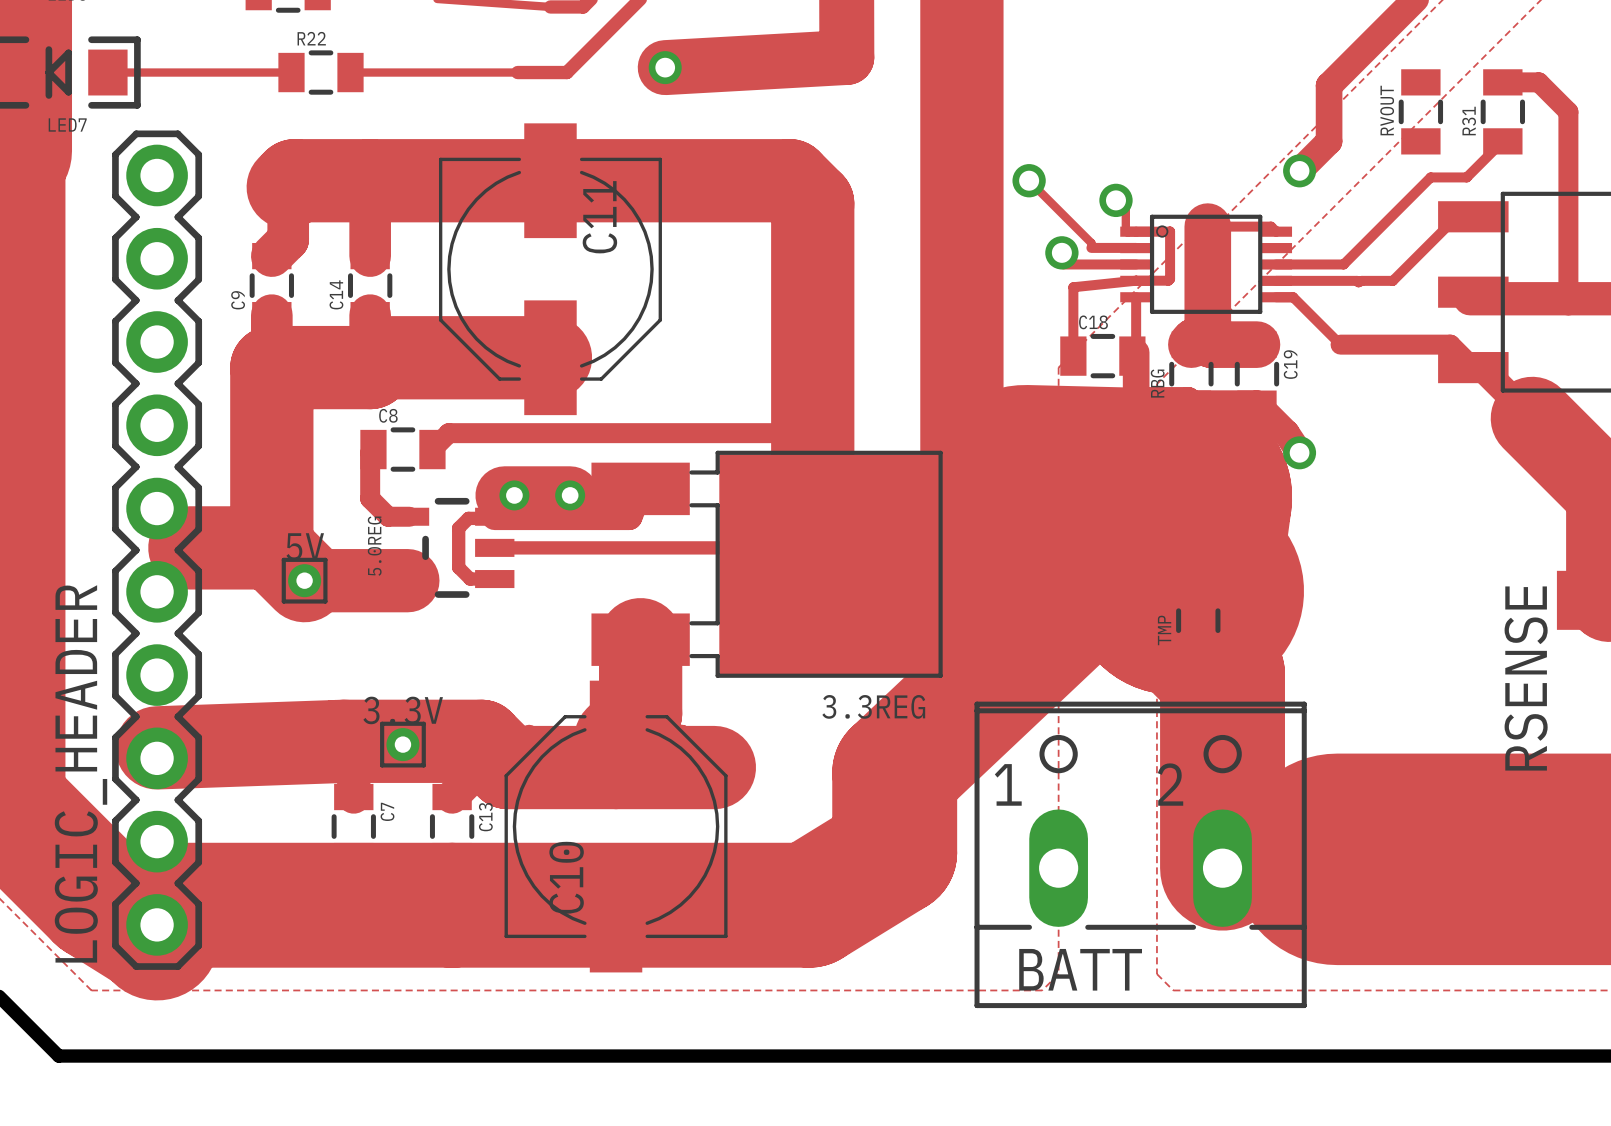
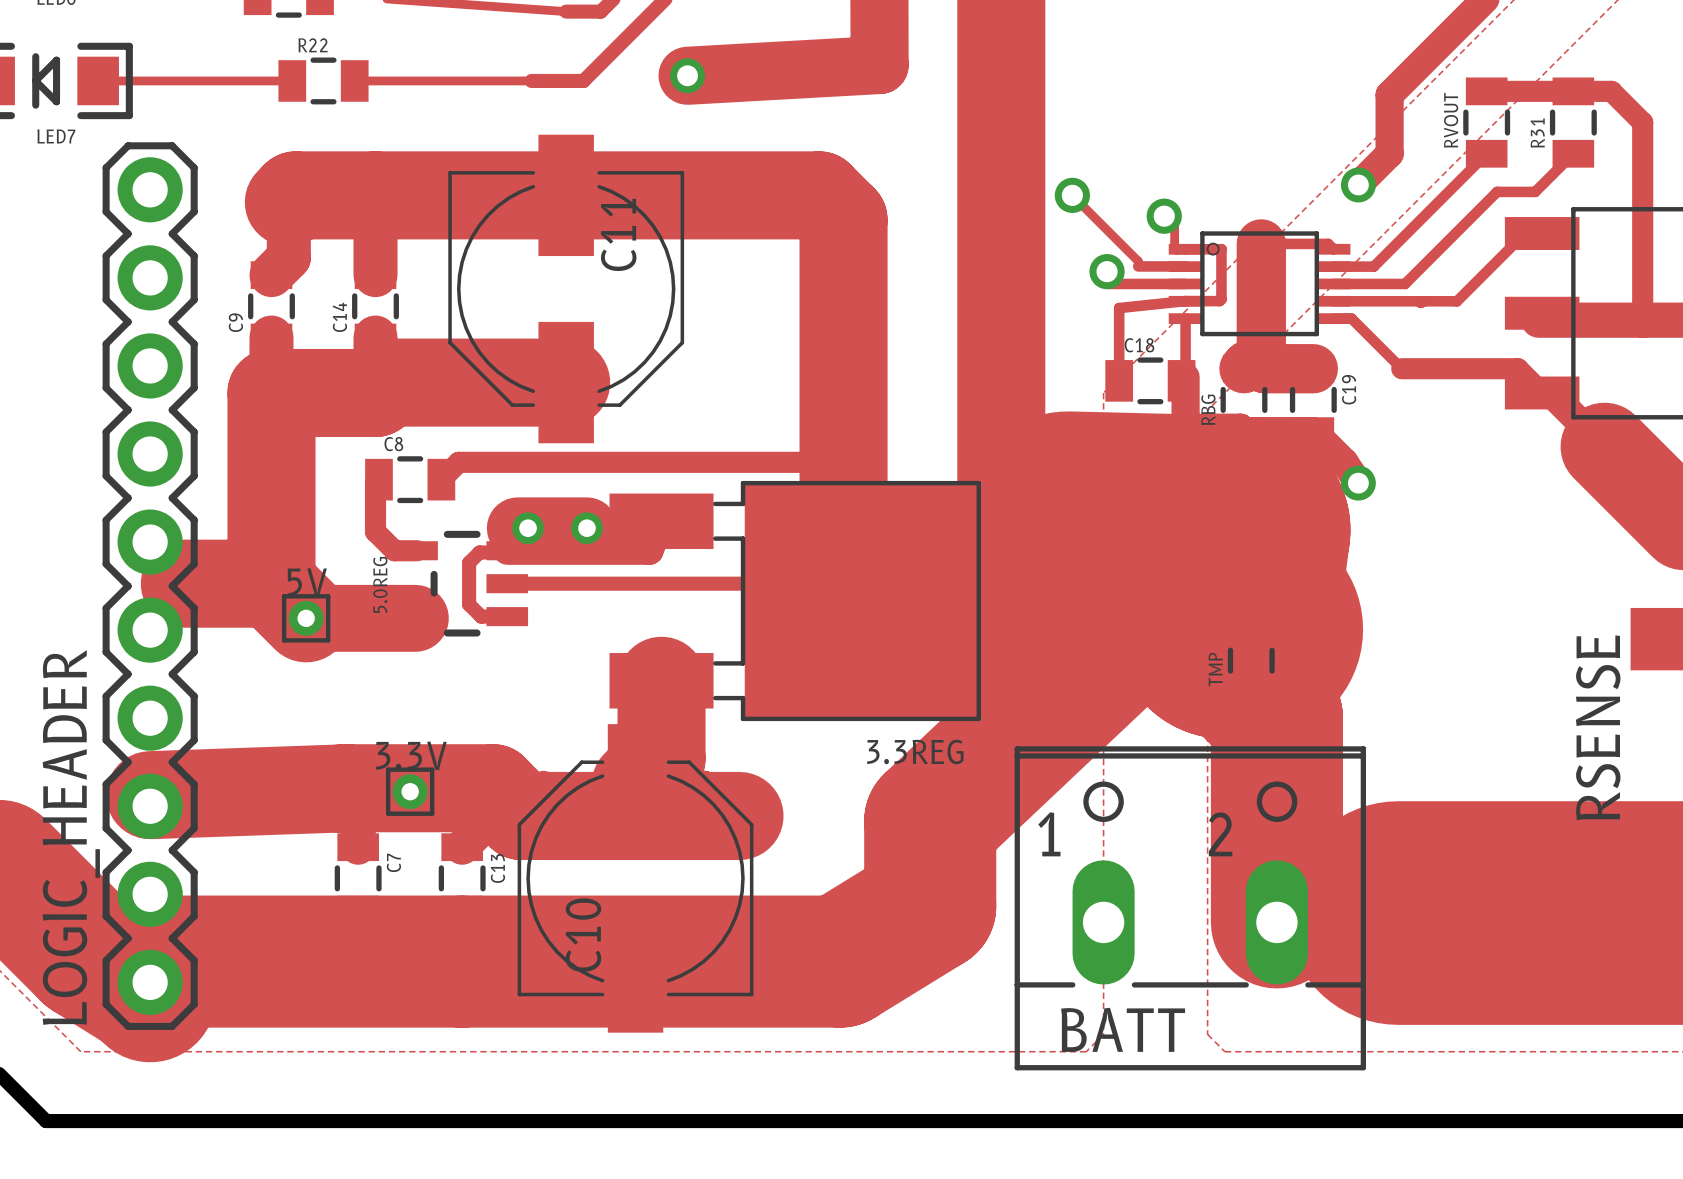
track: none -> (1486, 91) (1573, 91)
track: none -> (1486, 153) (1373, 266) (1333, 266)

